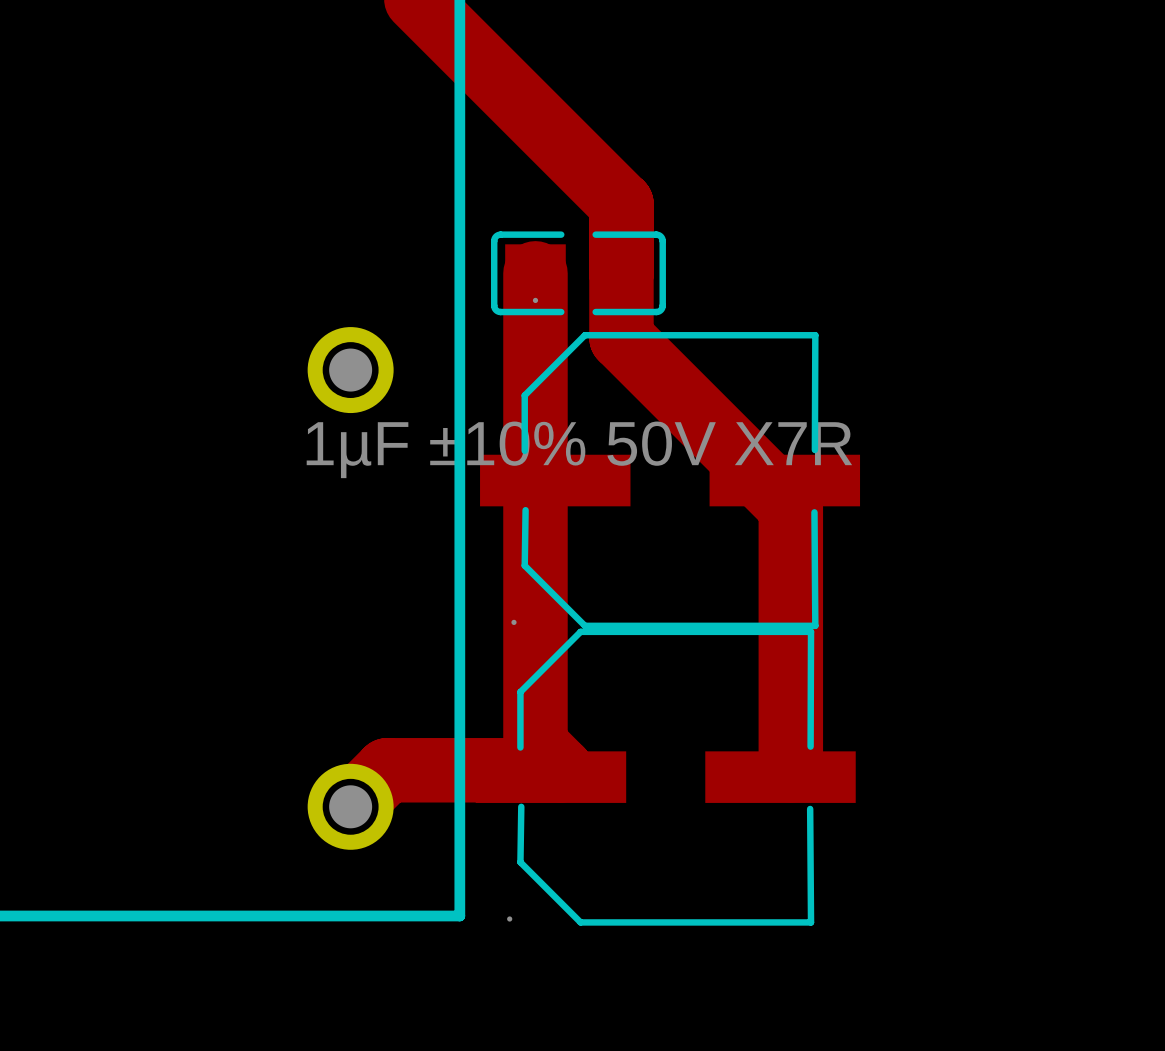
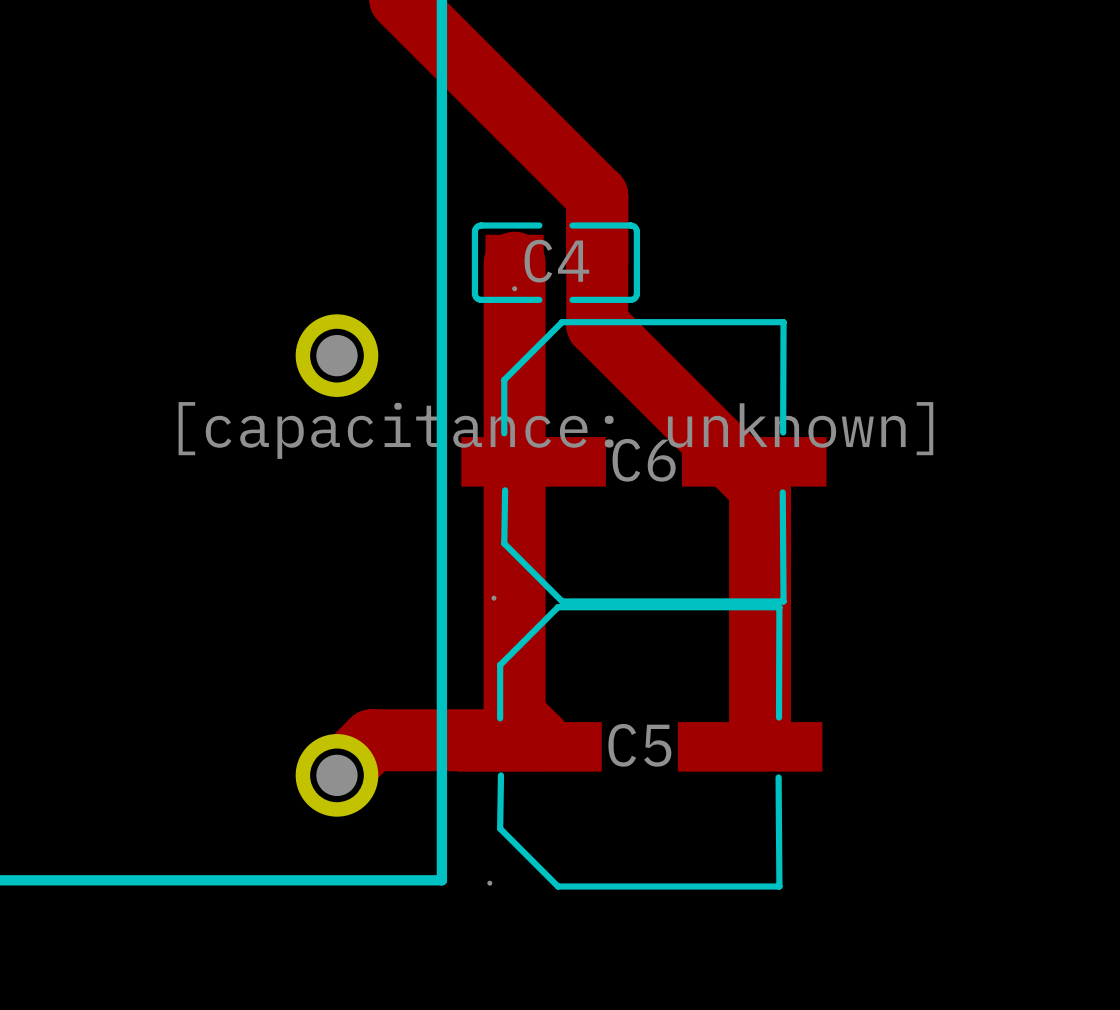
C4 name: none -> C4 (556, 261)
C4 value: 1µF ±10% 50V X7R (579, 449) -> [capacitance: unknown] (555, 430)
C6 name: none -> C6 (644, 460)
C5 name: none -> C5 (639, 745)

